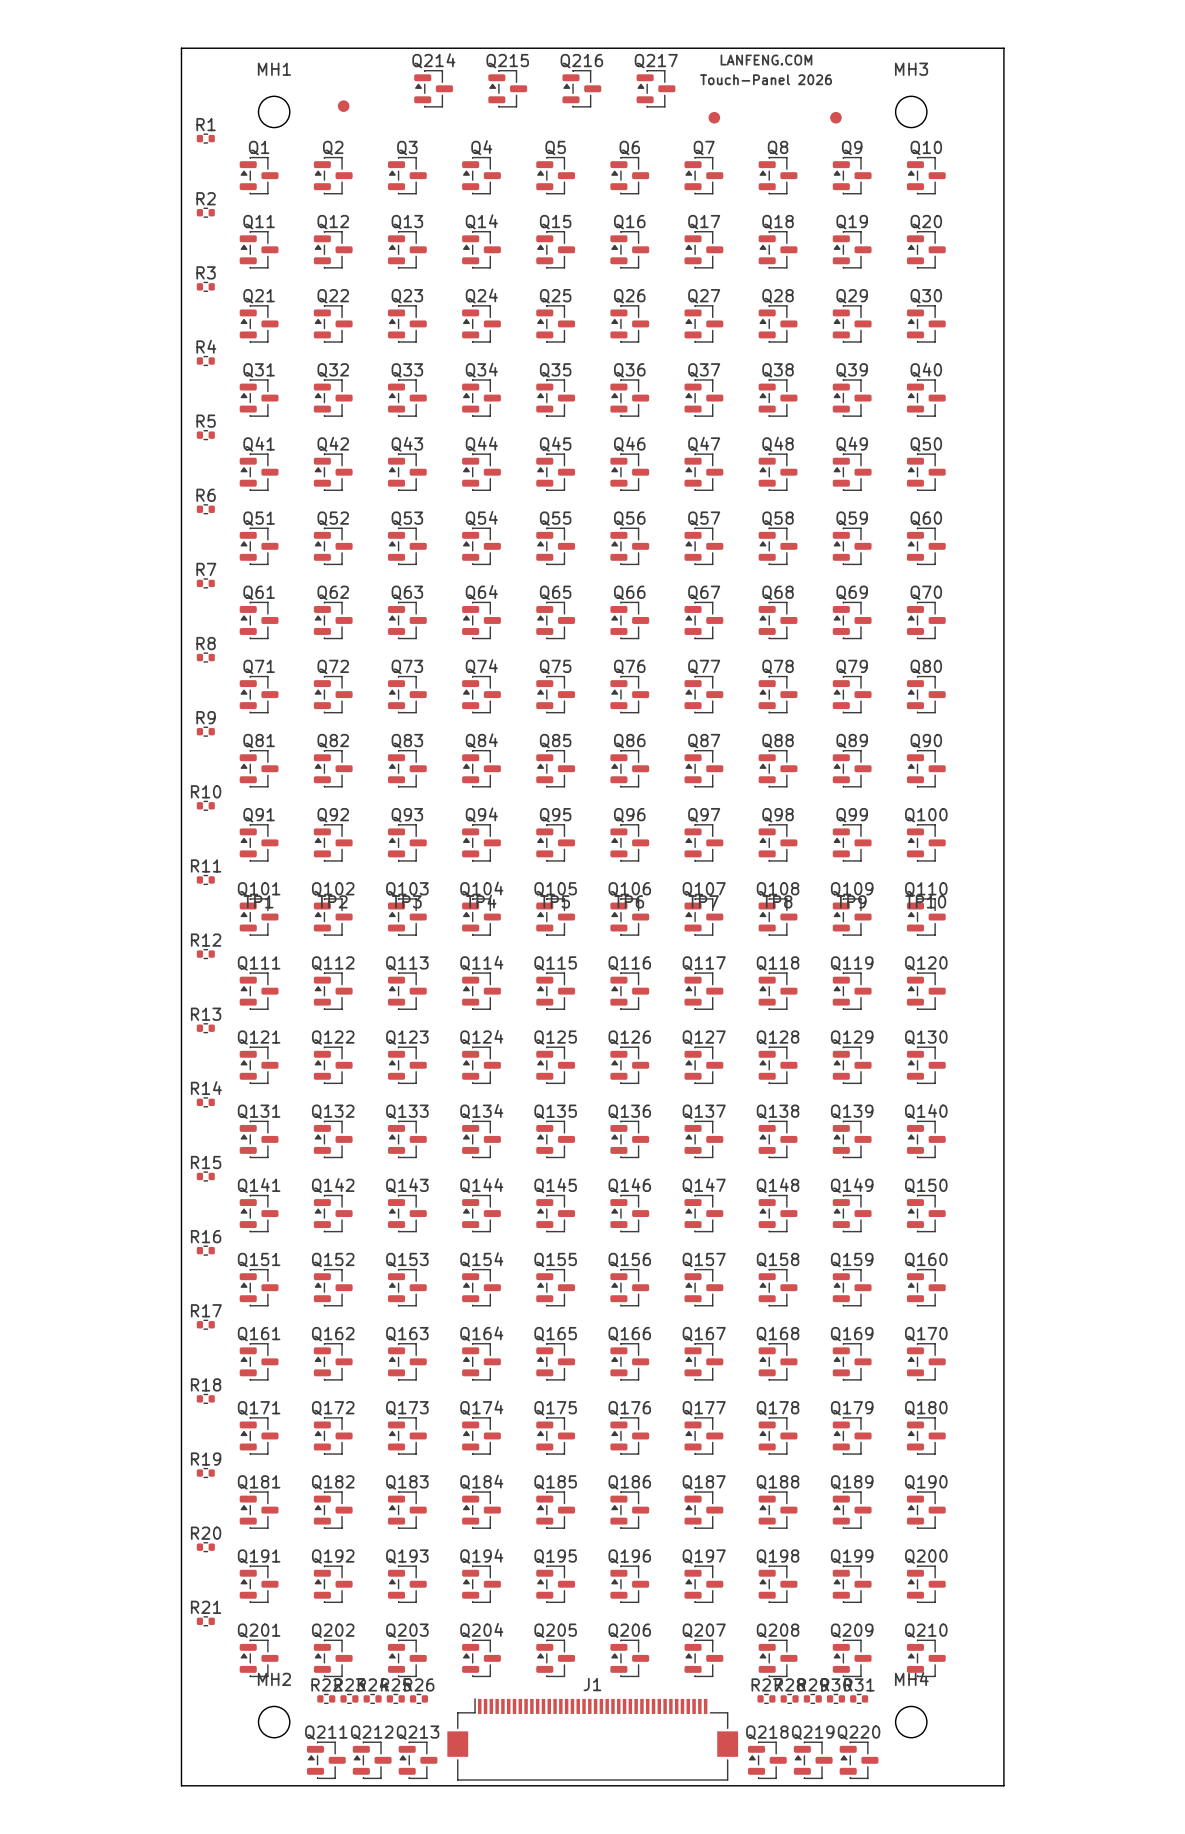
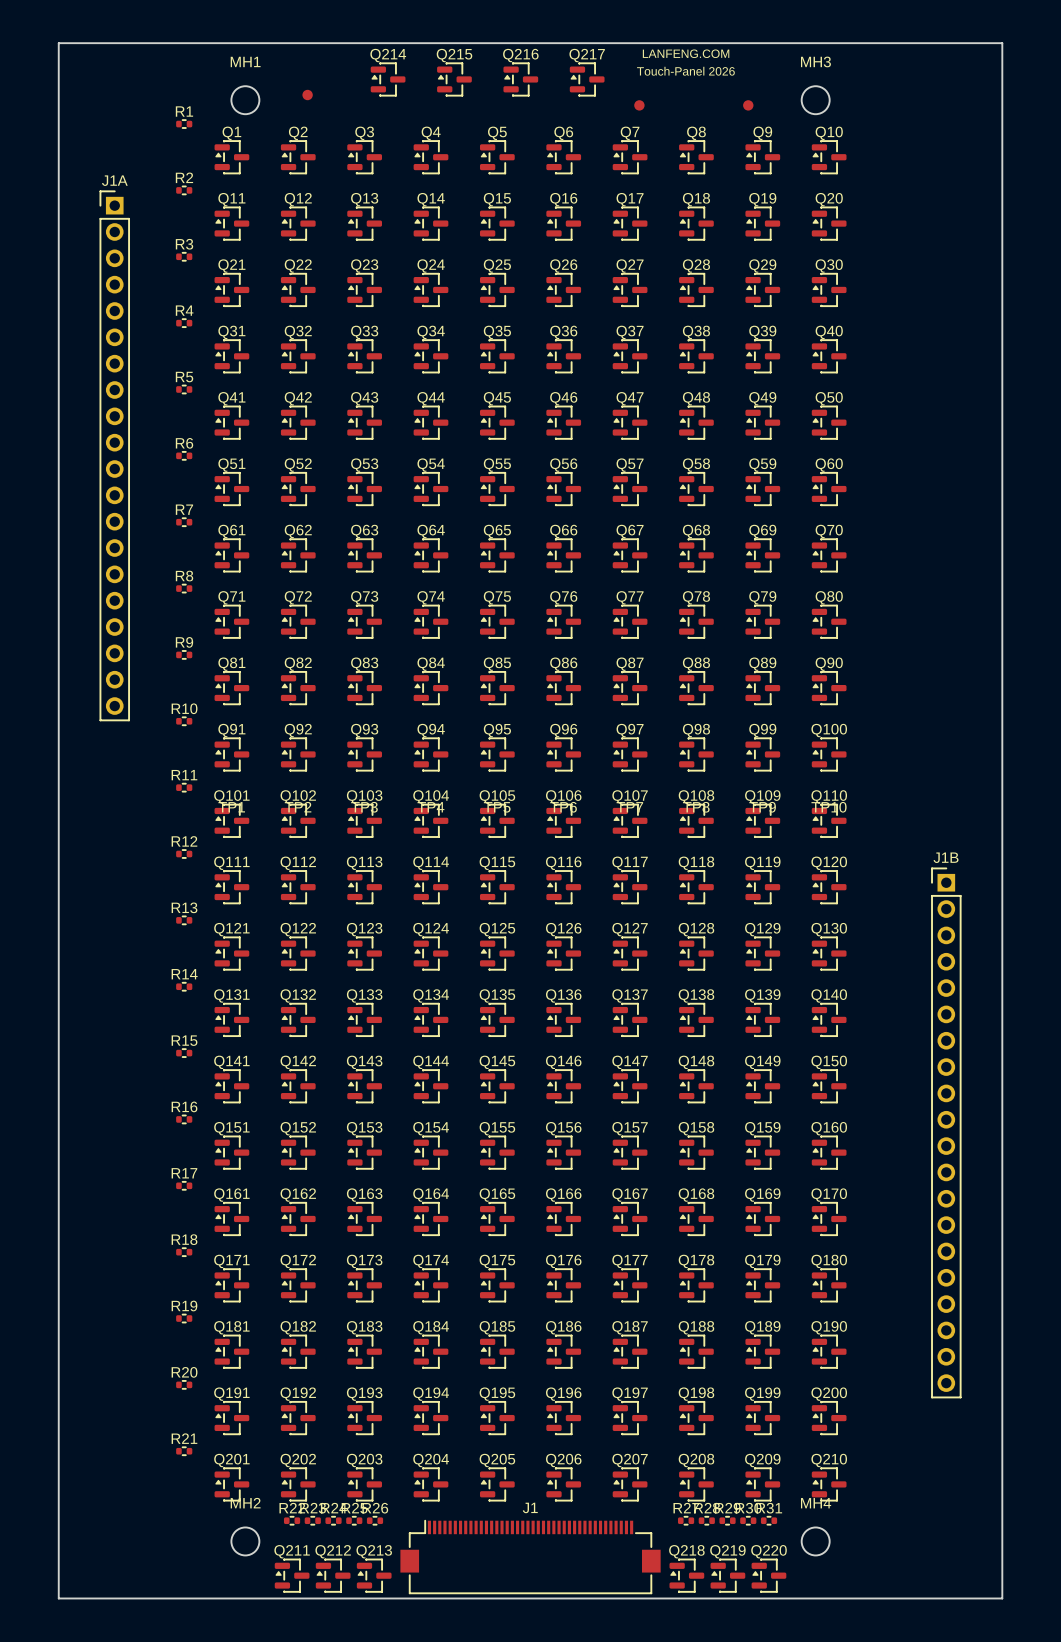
board edge: (181, 48) (181, 1785) -> (162, 43) (58, 43) (58, 1598) (162, 1598)
board edge: (1003, 48) (1003, 1785) -> (898, 43) (1002, 43) (1002, 1598) (898, 1598)
J1A: none -> (114, 455)
J1B: none -> (946, 1132)

